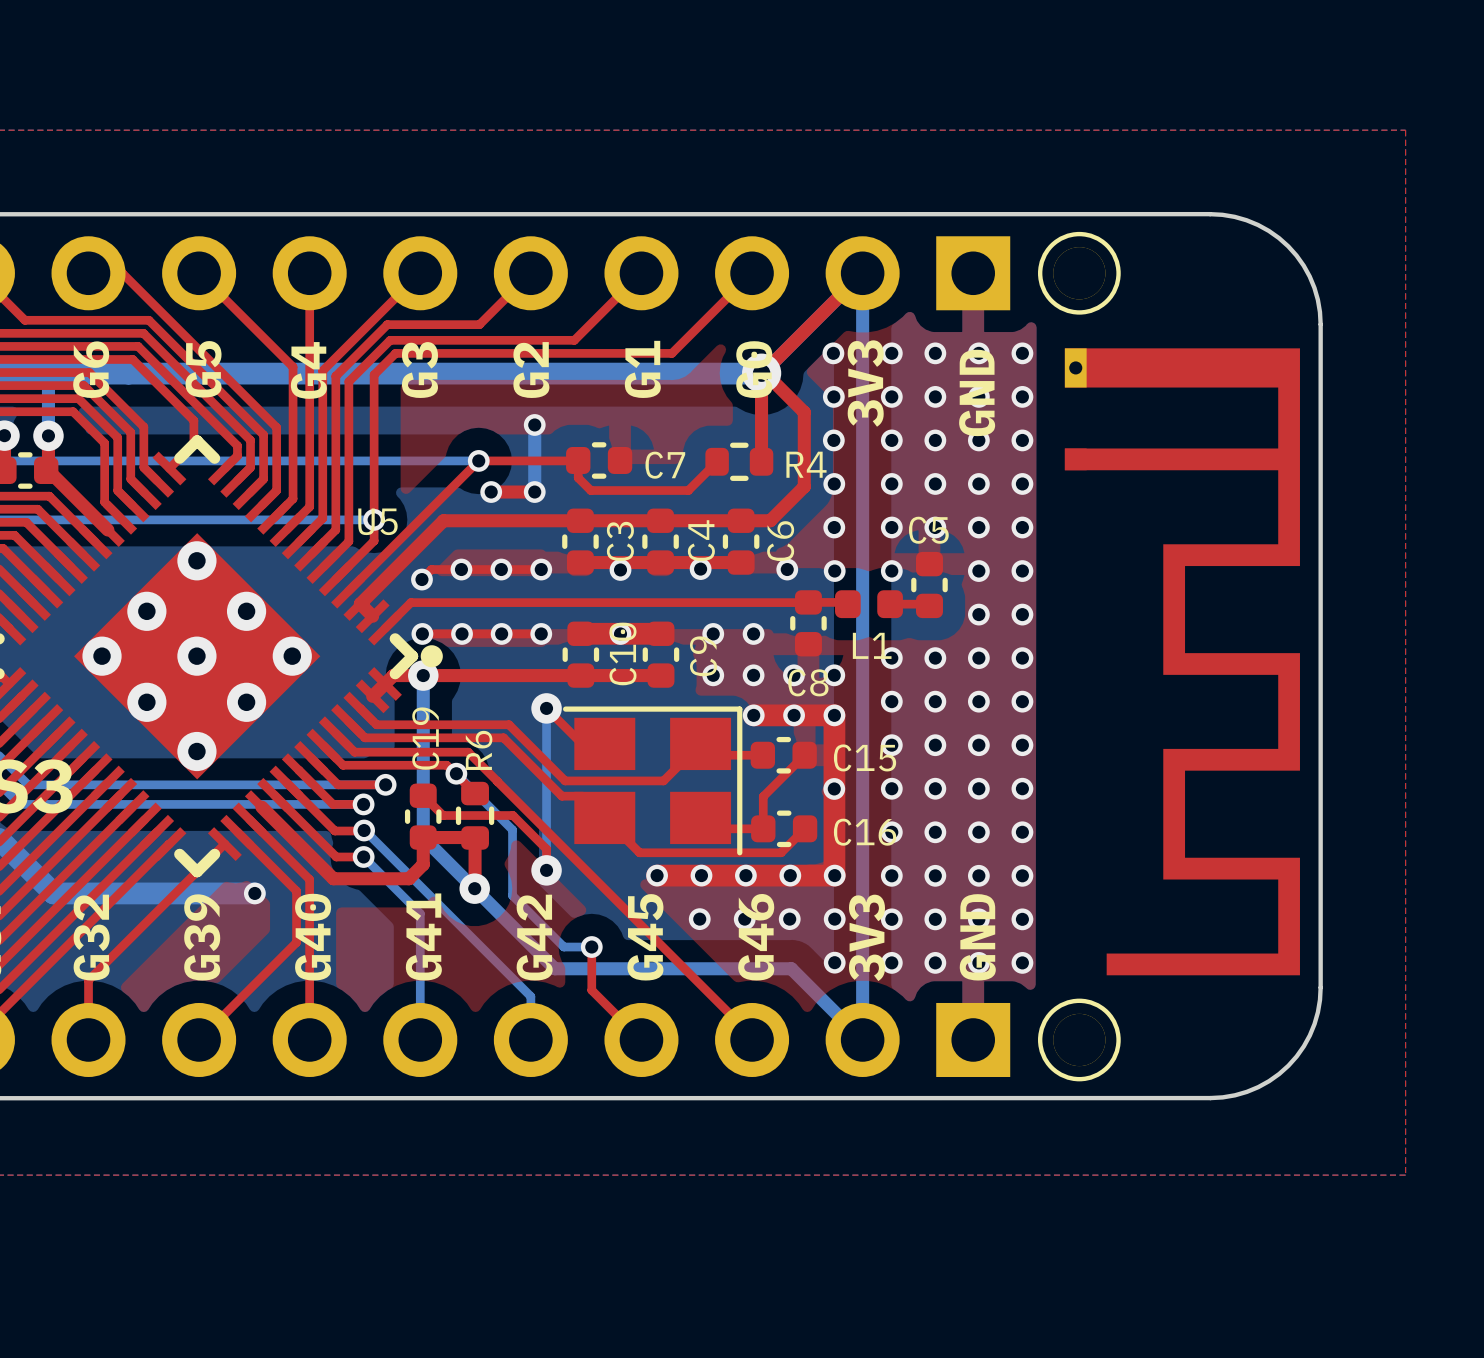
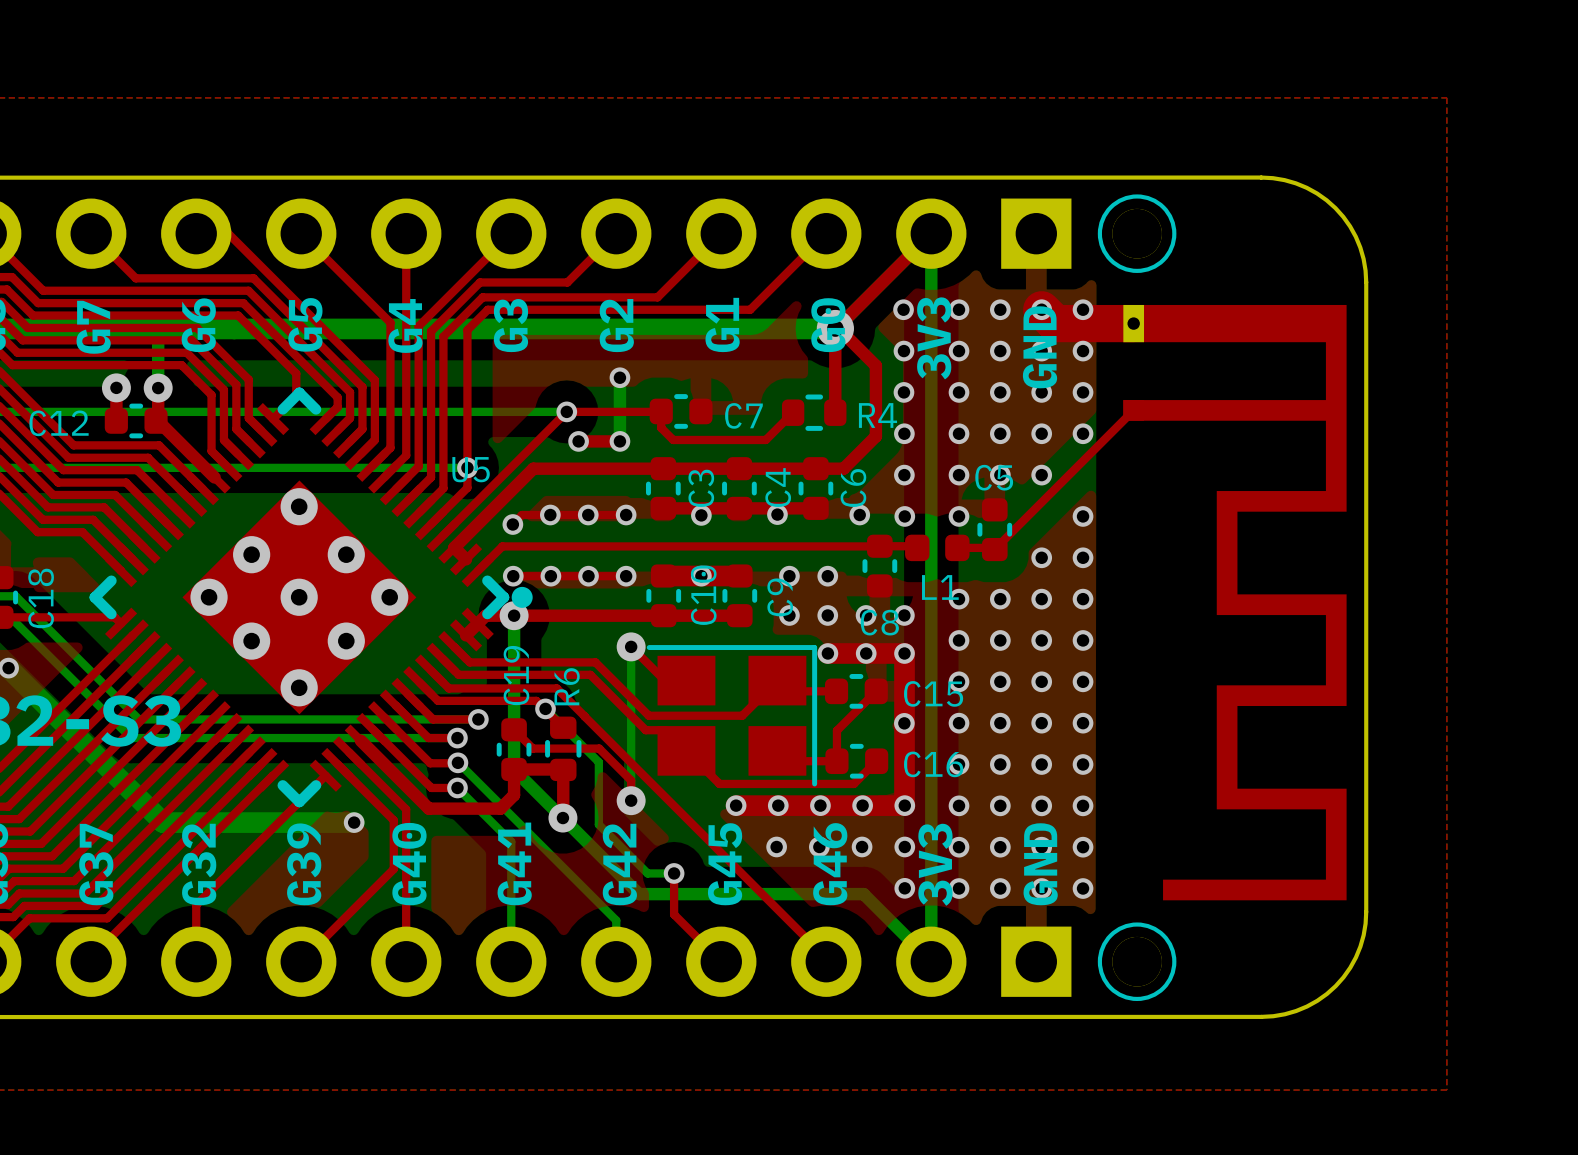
top track: none -> (1041, 309) (1055, 323) (1133, 323)
top track: none -> (1133, 410) (994, 549)
via: (1022, 527) -> none
via: (978, 571) -> none

